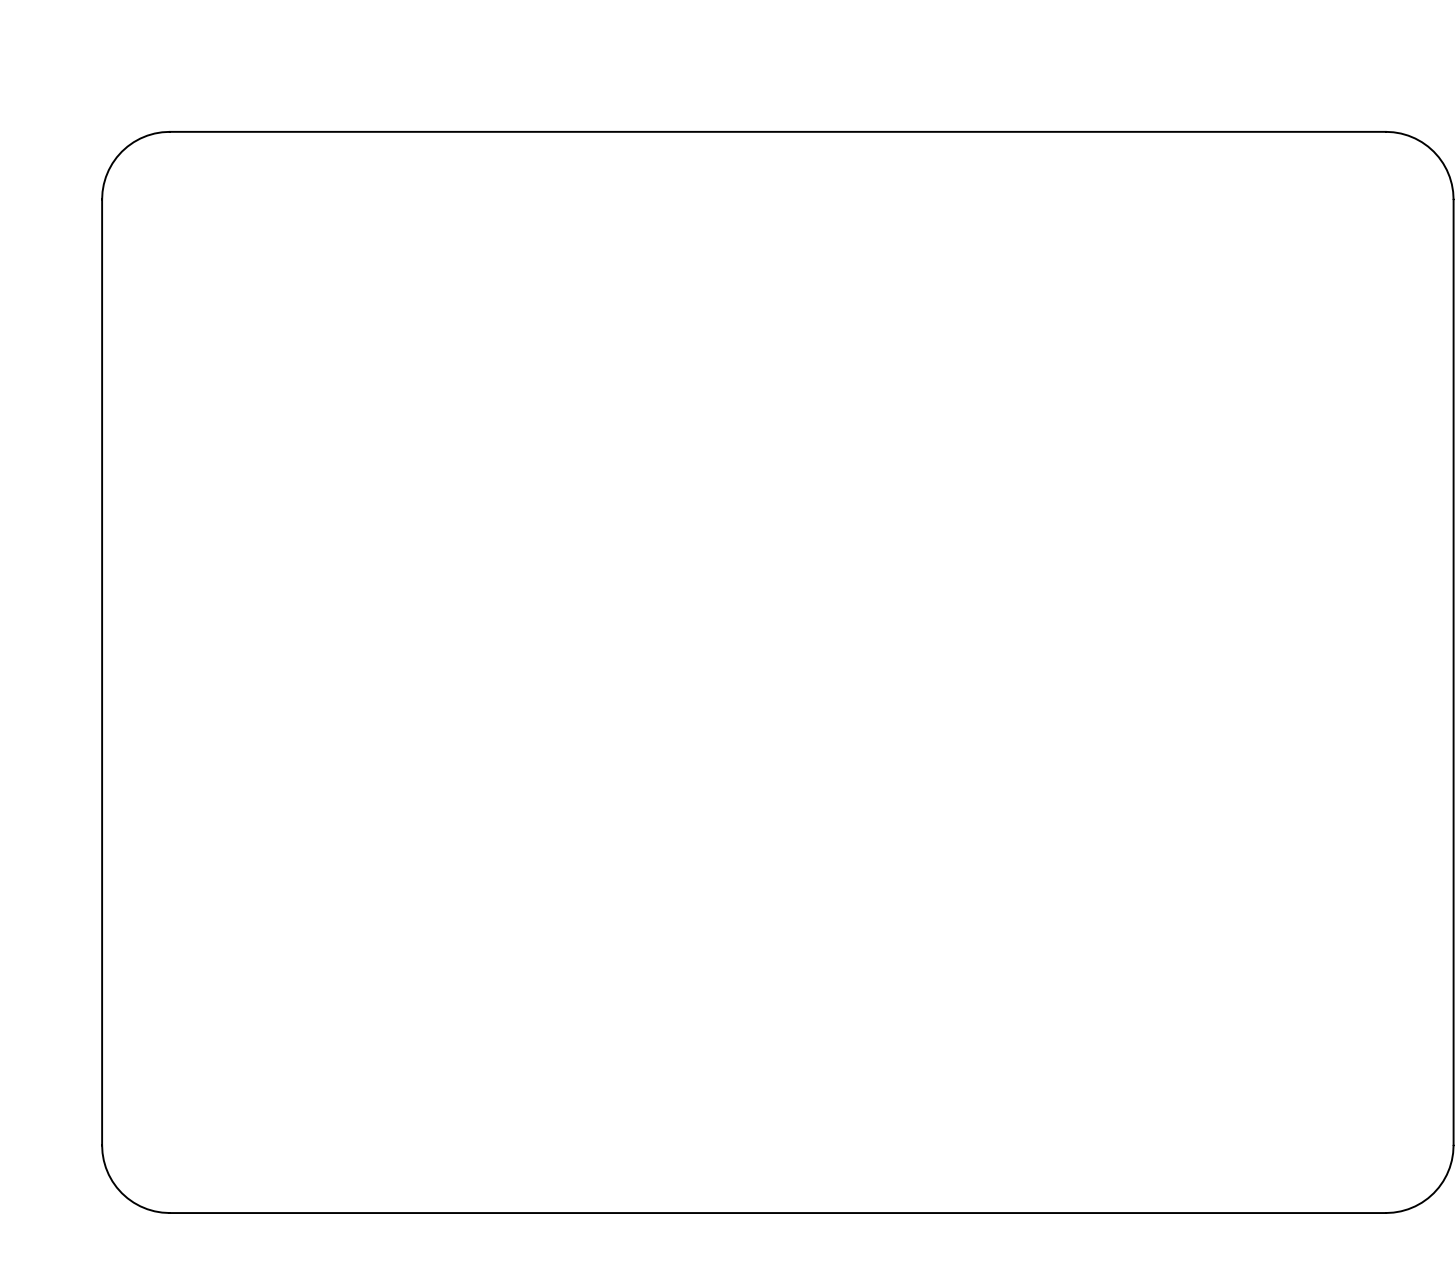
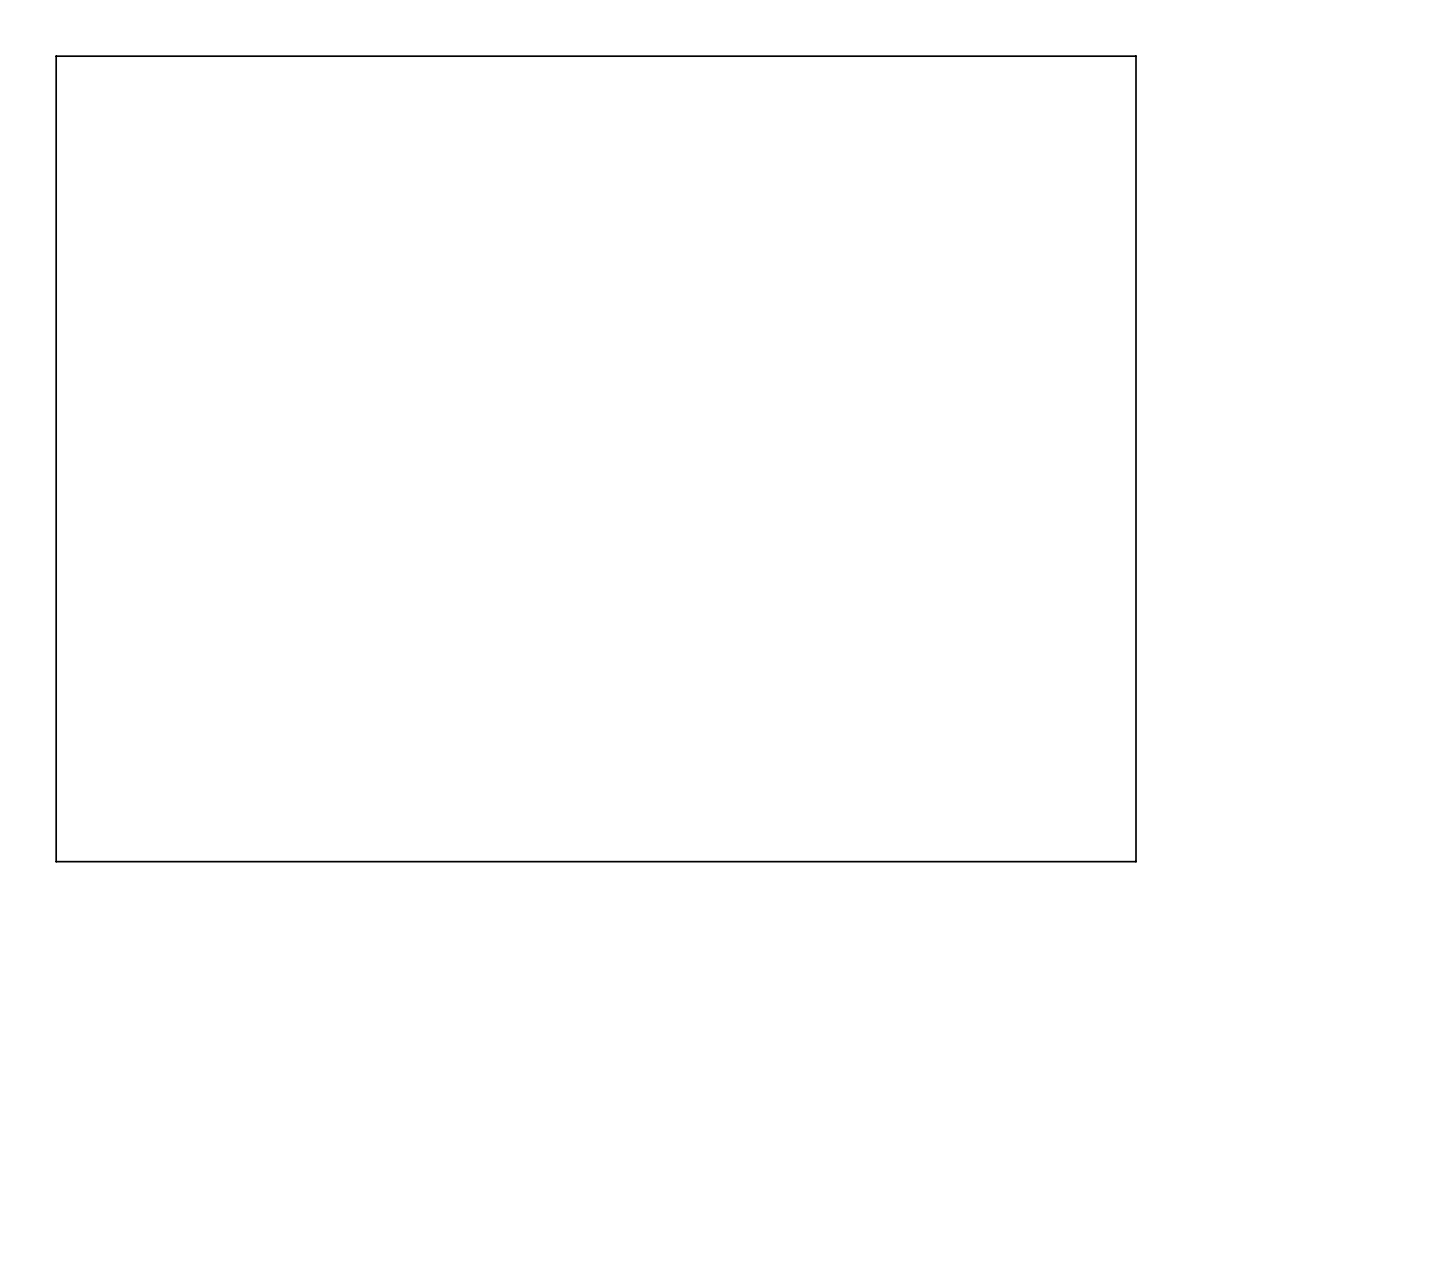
board edge: none -> (56, 56) (1136, 56) (1136, 861) (56, 861) (56, 56)
board edge: (169, 131) (1386, 131) (1408, 135) (1428, 146) (1438, 157) (1446, 170) (1451, 184) (1453, 199) (1453, 1145) (1449, 1167) (1438, 1187) (1428, 1198) (1415, 1206) (1401, 1211) (1386, 1213) (169, 1213) (147, 1209) (127, 1198) (116, 1187) (108, 1174) (103, 1160) (102, 1145) (102, 199) (103, 184) (108, 170) (121, 151) (140, 138) (154, 133) (169, 131) -> none

